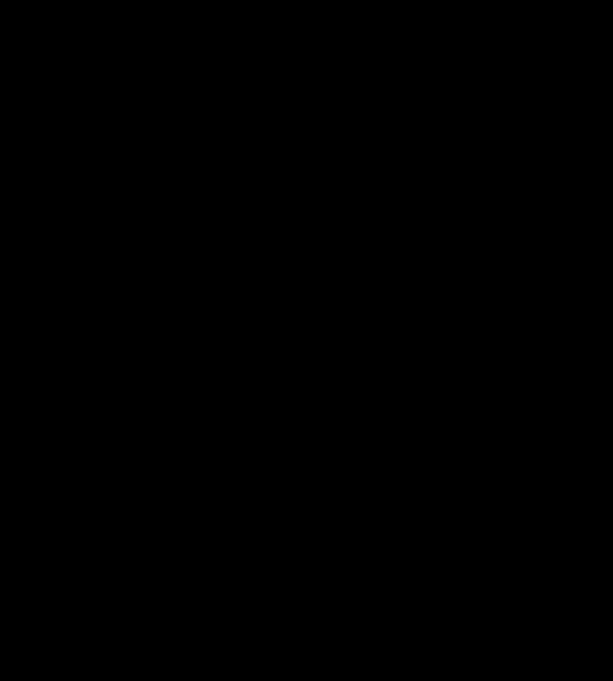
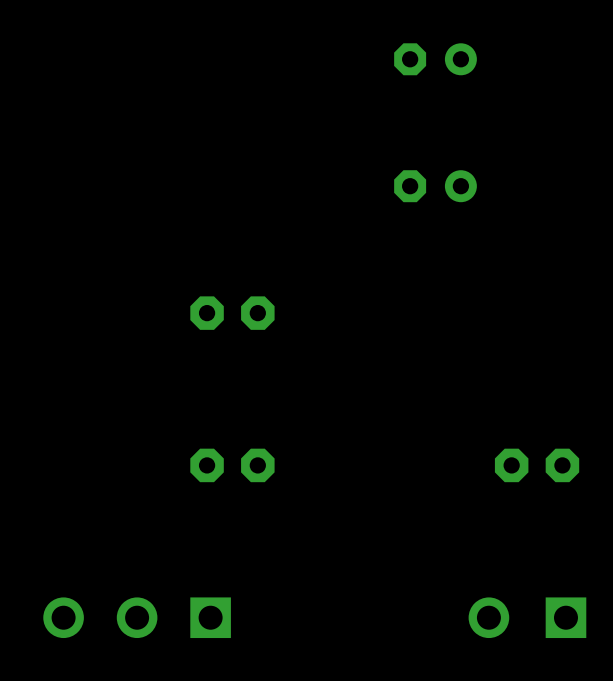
part: none -> (435, 59)
part: none -> (435, 186)
part: none -> (232, 313)
part: none -> (232, 465)
part: none -> (537, 465)
part: none -> (137, 617)
part: none -> (527, 617)

